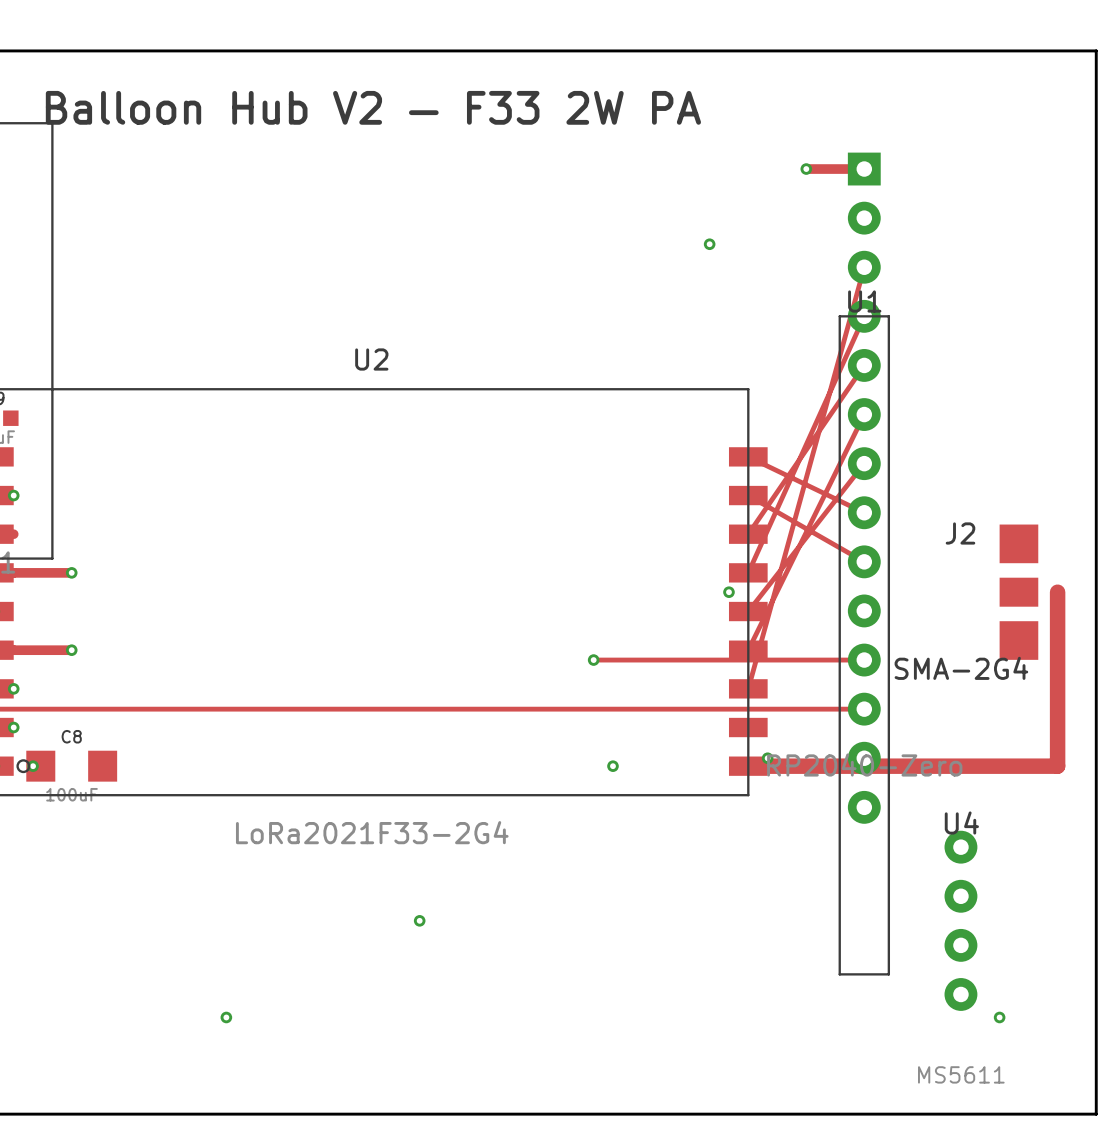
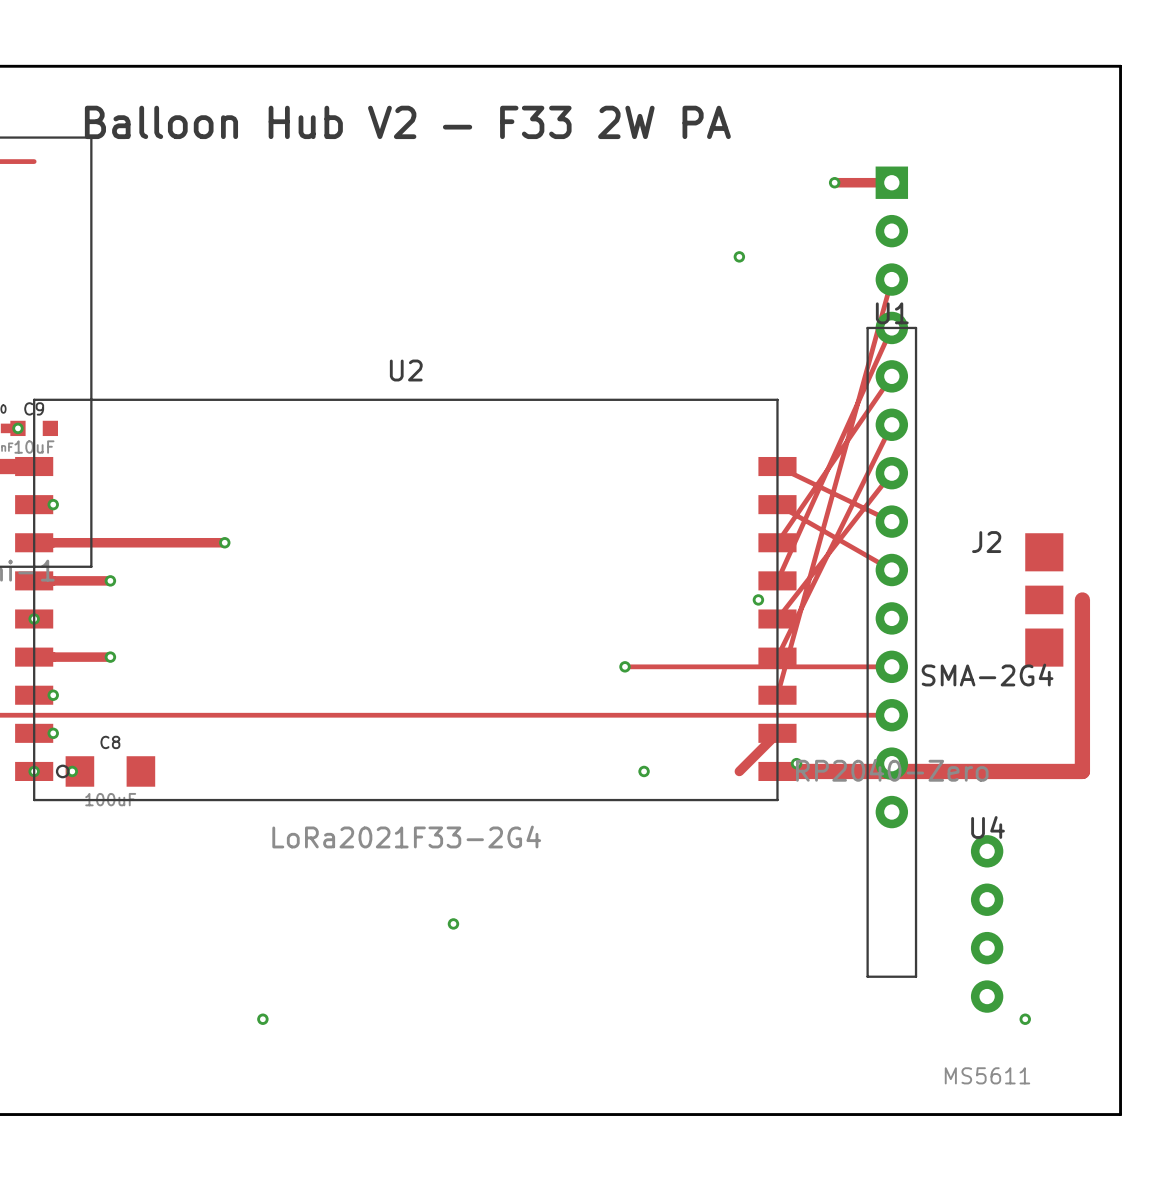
track: none -> (53, 542) (224, 542)
via: none -> (224, 542)
track: none -> (777, 733) (739, 771)

